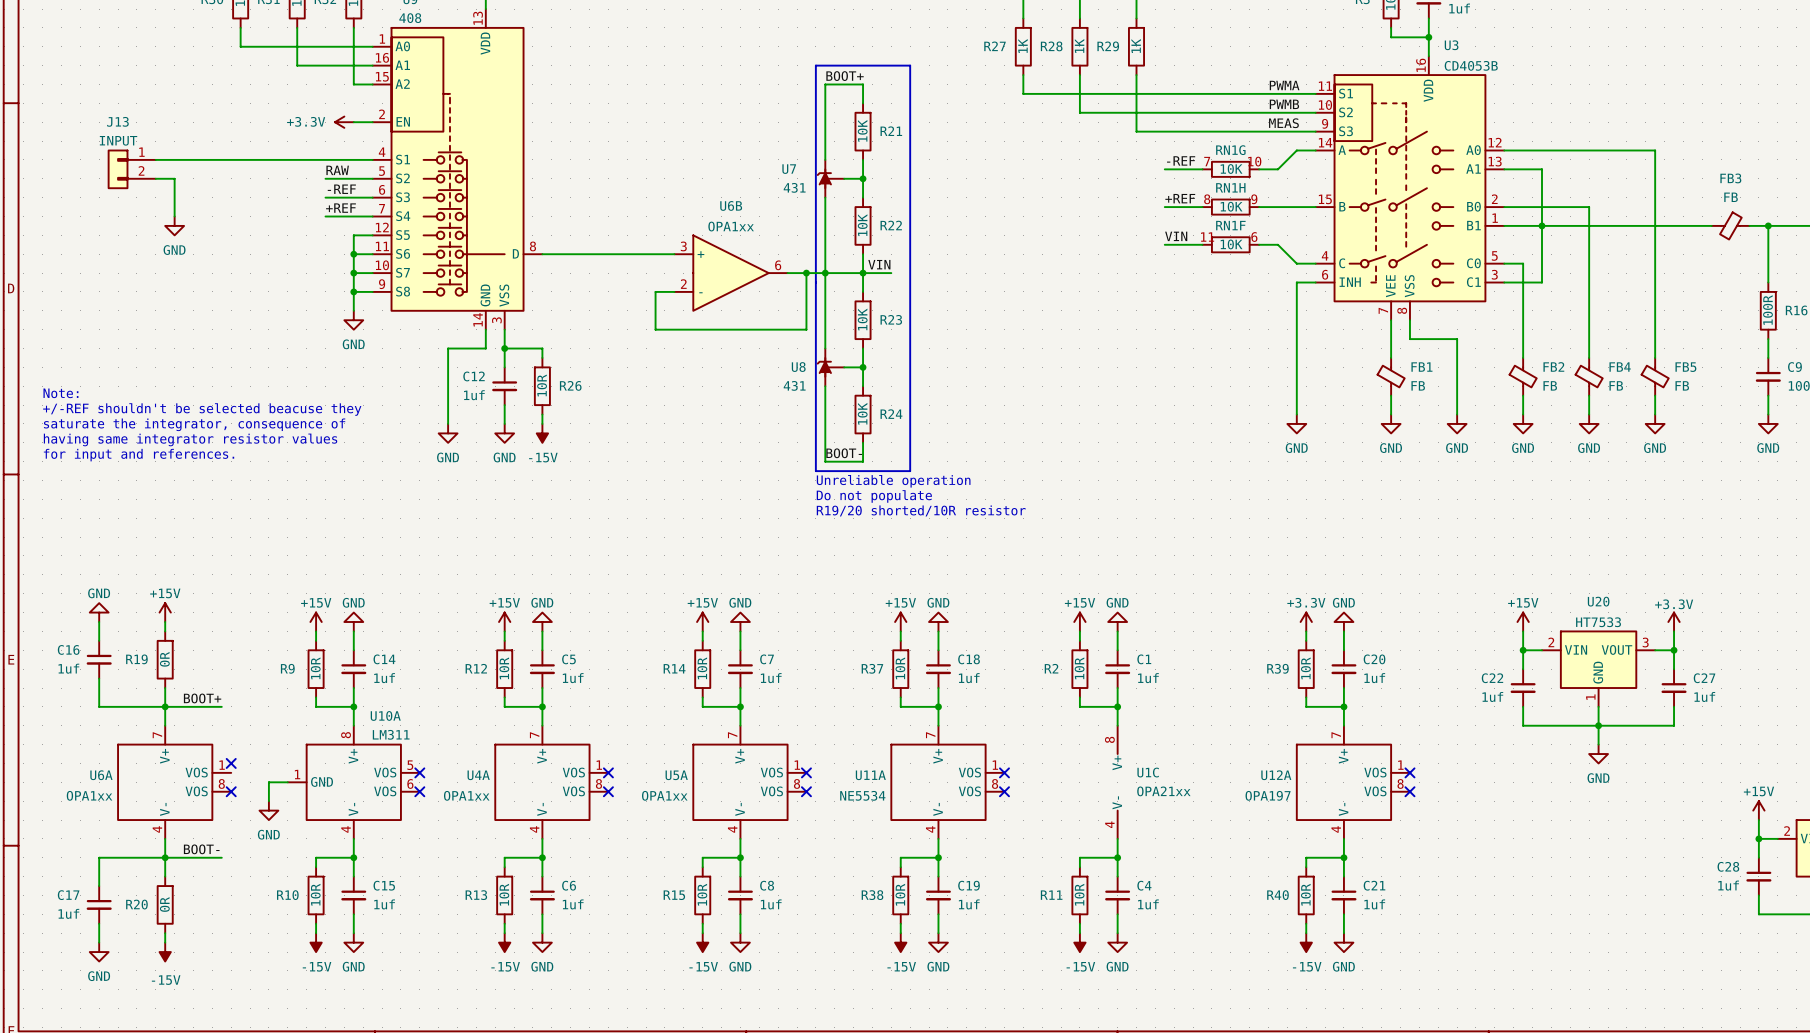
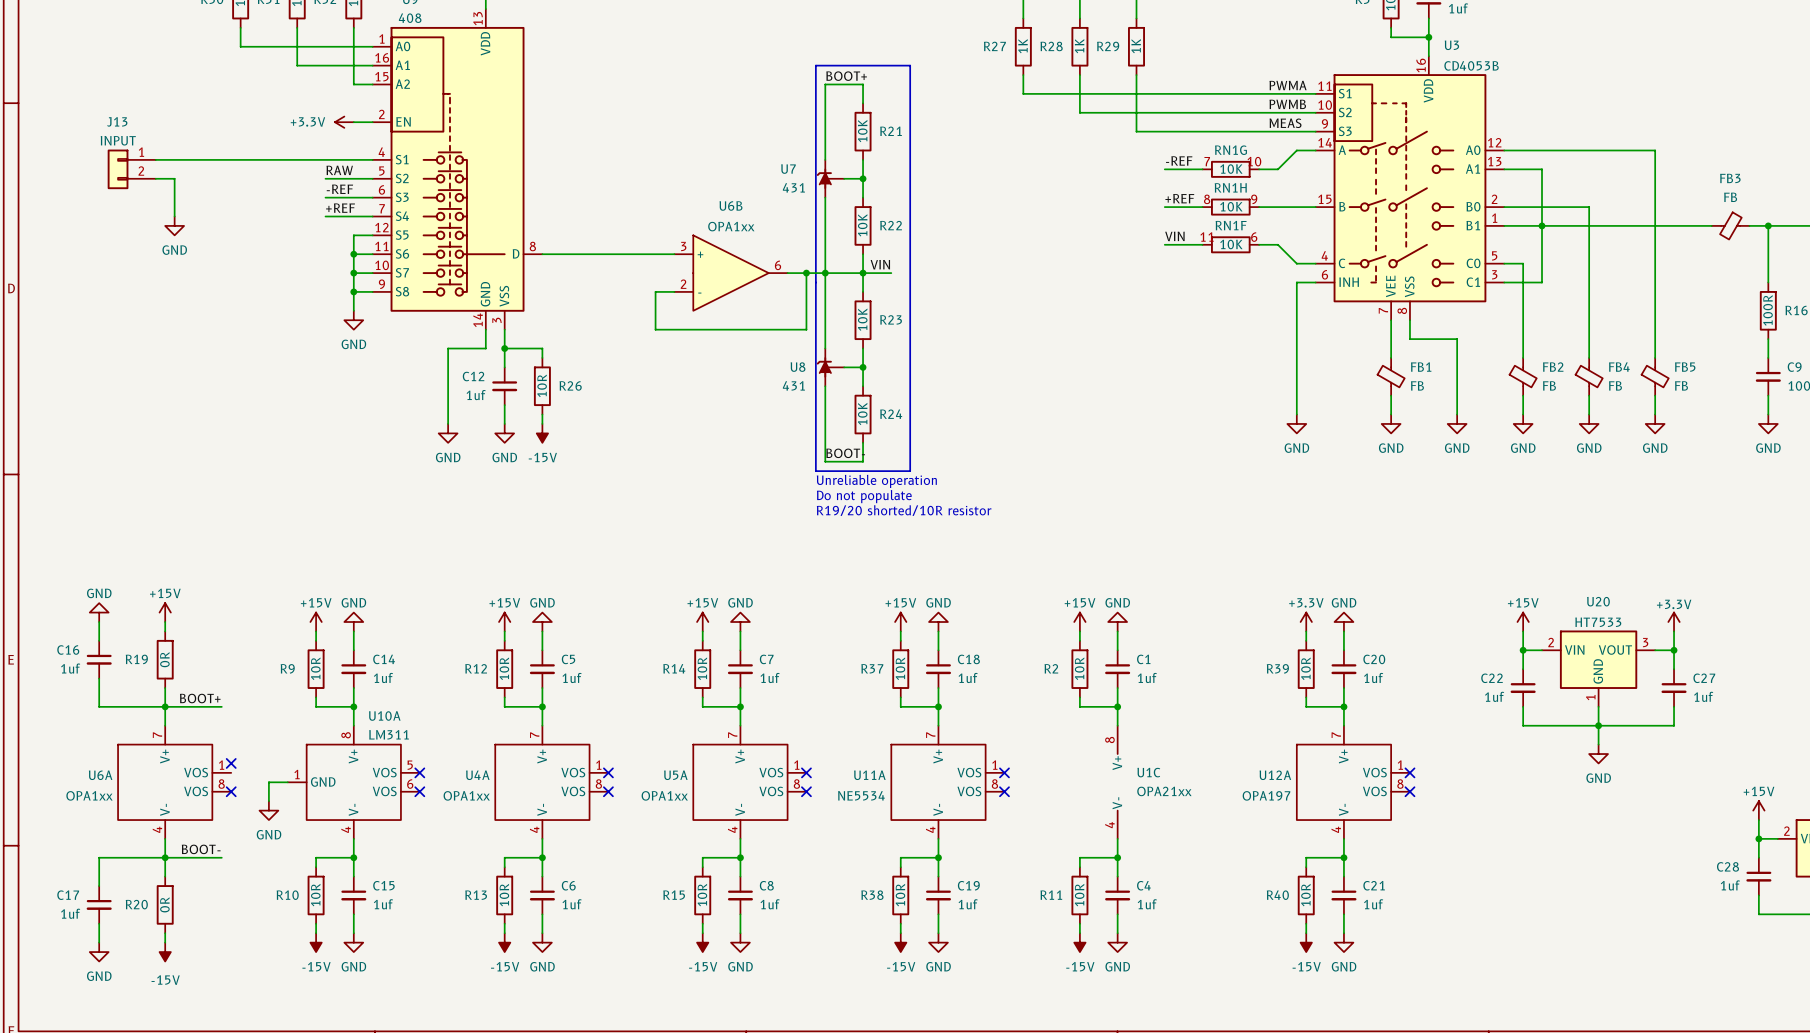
text: Note: (60, 393) -> none
text: +/-REF shouldn't be selected beacuse they (202, 409) -> none
text: saturate the integrator, consequence of (194, 424) -> none
text: having same integrator resistor values (190, 439) -> none
text: for input and references. (139, 455) -> none

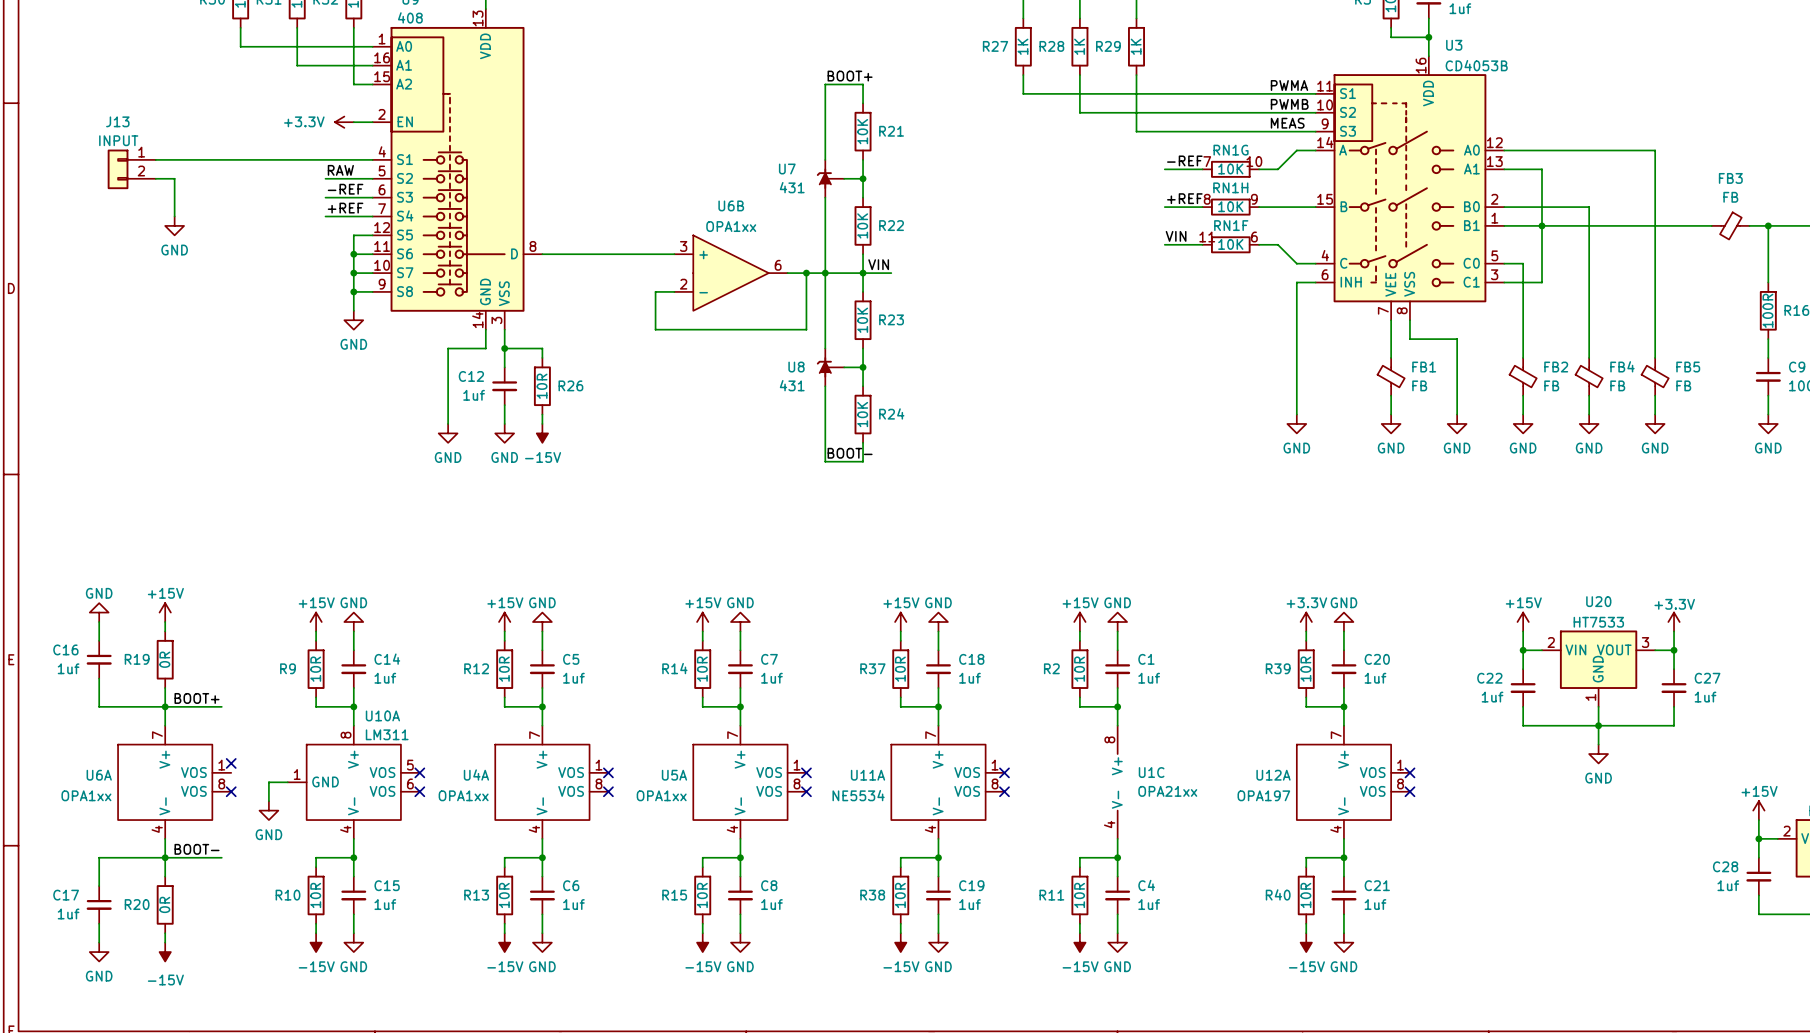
line: (815, 65) (815, 471) (910, 471) (910, 65) (815, 65) -> none
text: Unreliable operation (876, 481) -> none
text: Do not populate (864, 496) -> none
text: R19/20 shorted/10R resistor (904, 510) -> none

